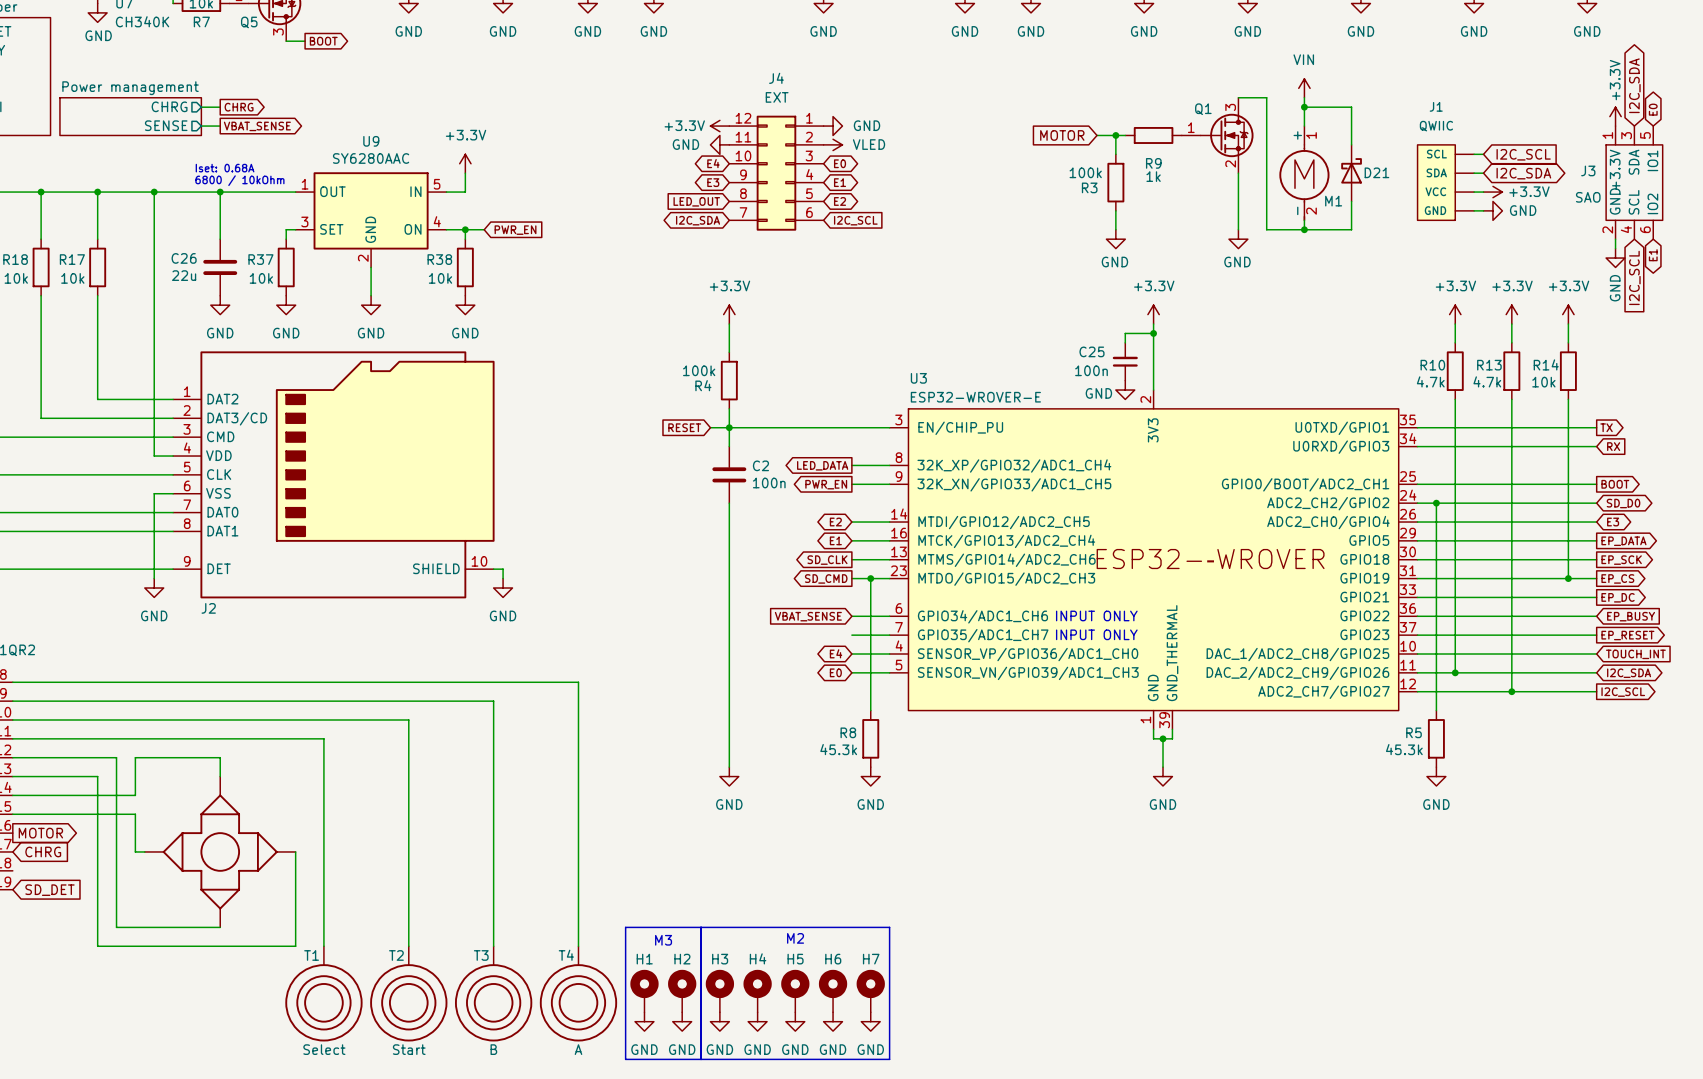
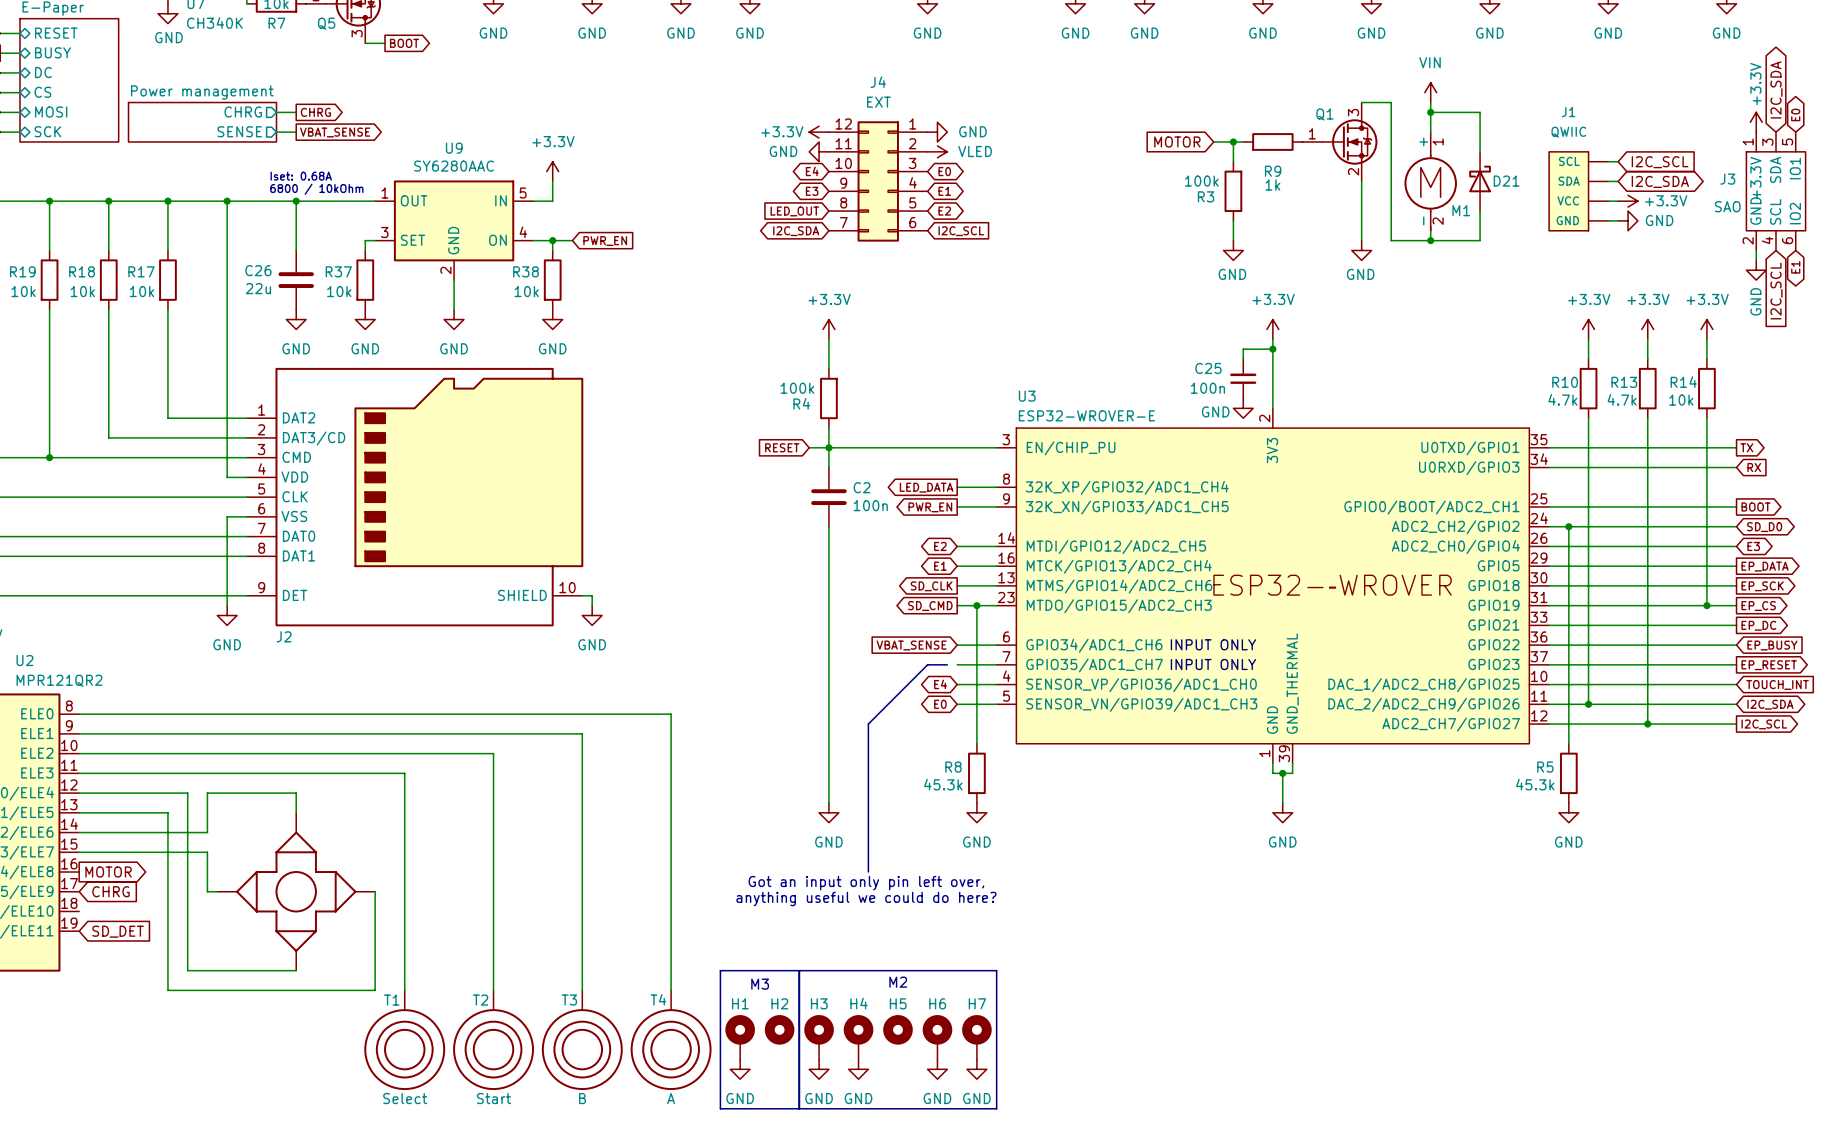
line: none -> (947, 664) (927, 664) (868, 724) (868, 872)
text: none -> Got an input only pin left over, (866, 883)
text: none -> anything useful we could do here? (866, 899)
H2 symbol: [668, 969, 697, 1013] -> [764, 1015, 795, 1045]
H5 symbol: [781, 969, 810, 1013] -> [883, 1015, 913, 1045]
power symbol: GND (682, 1021) -> none
power symbol: GND (795, 1021) -> none

